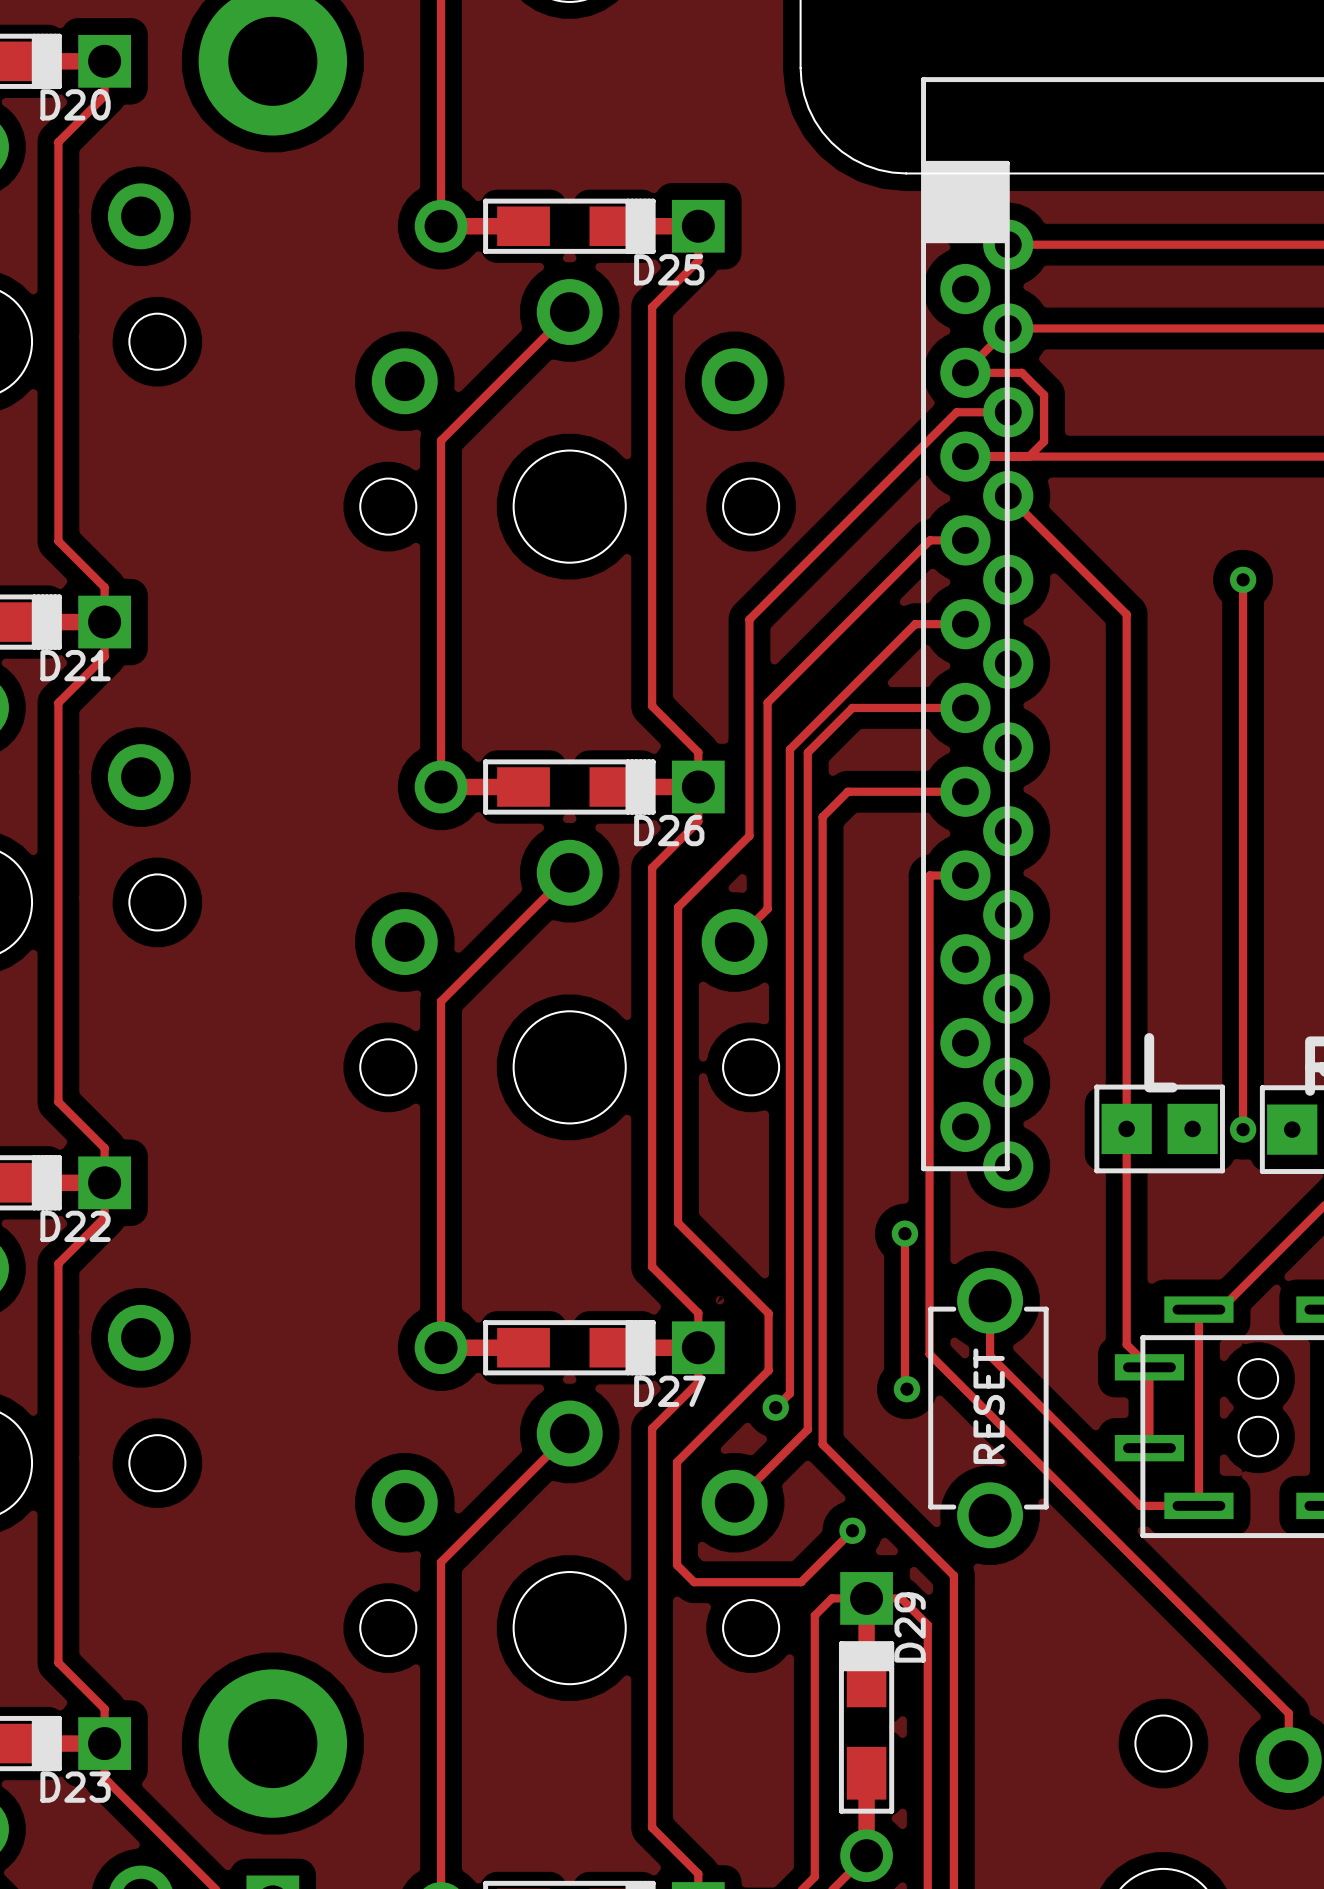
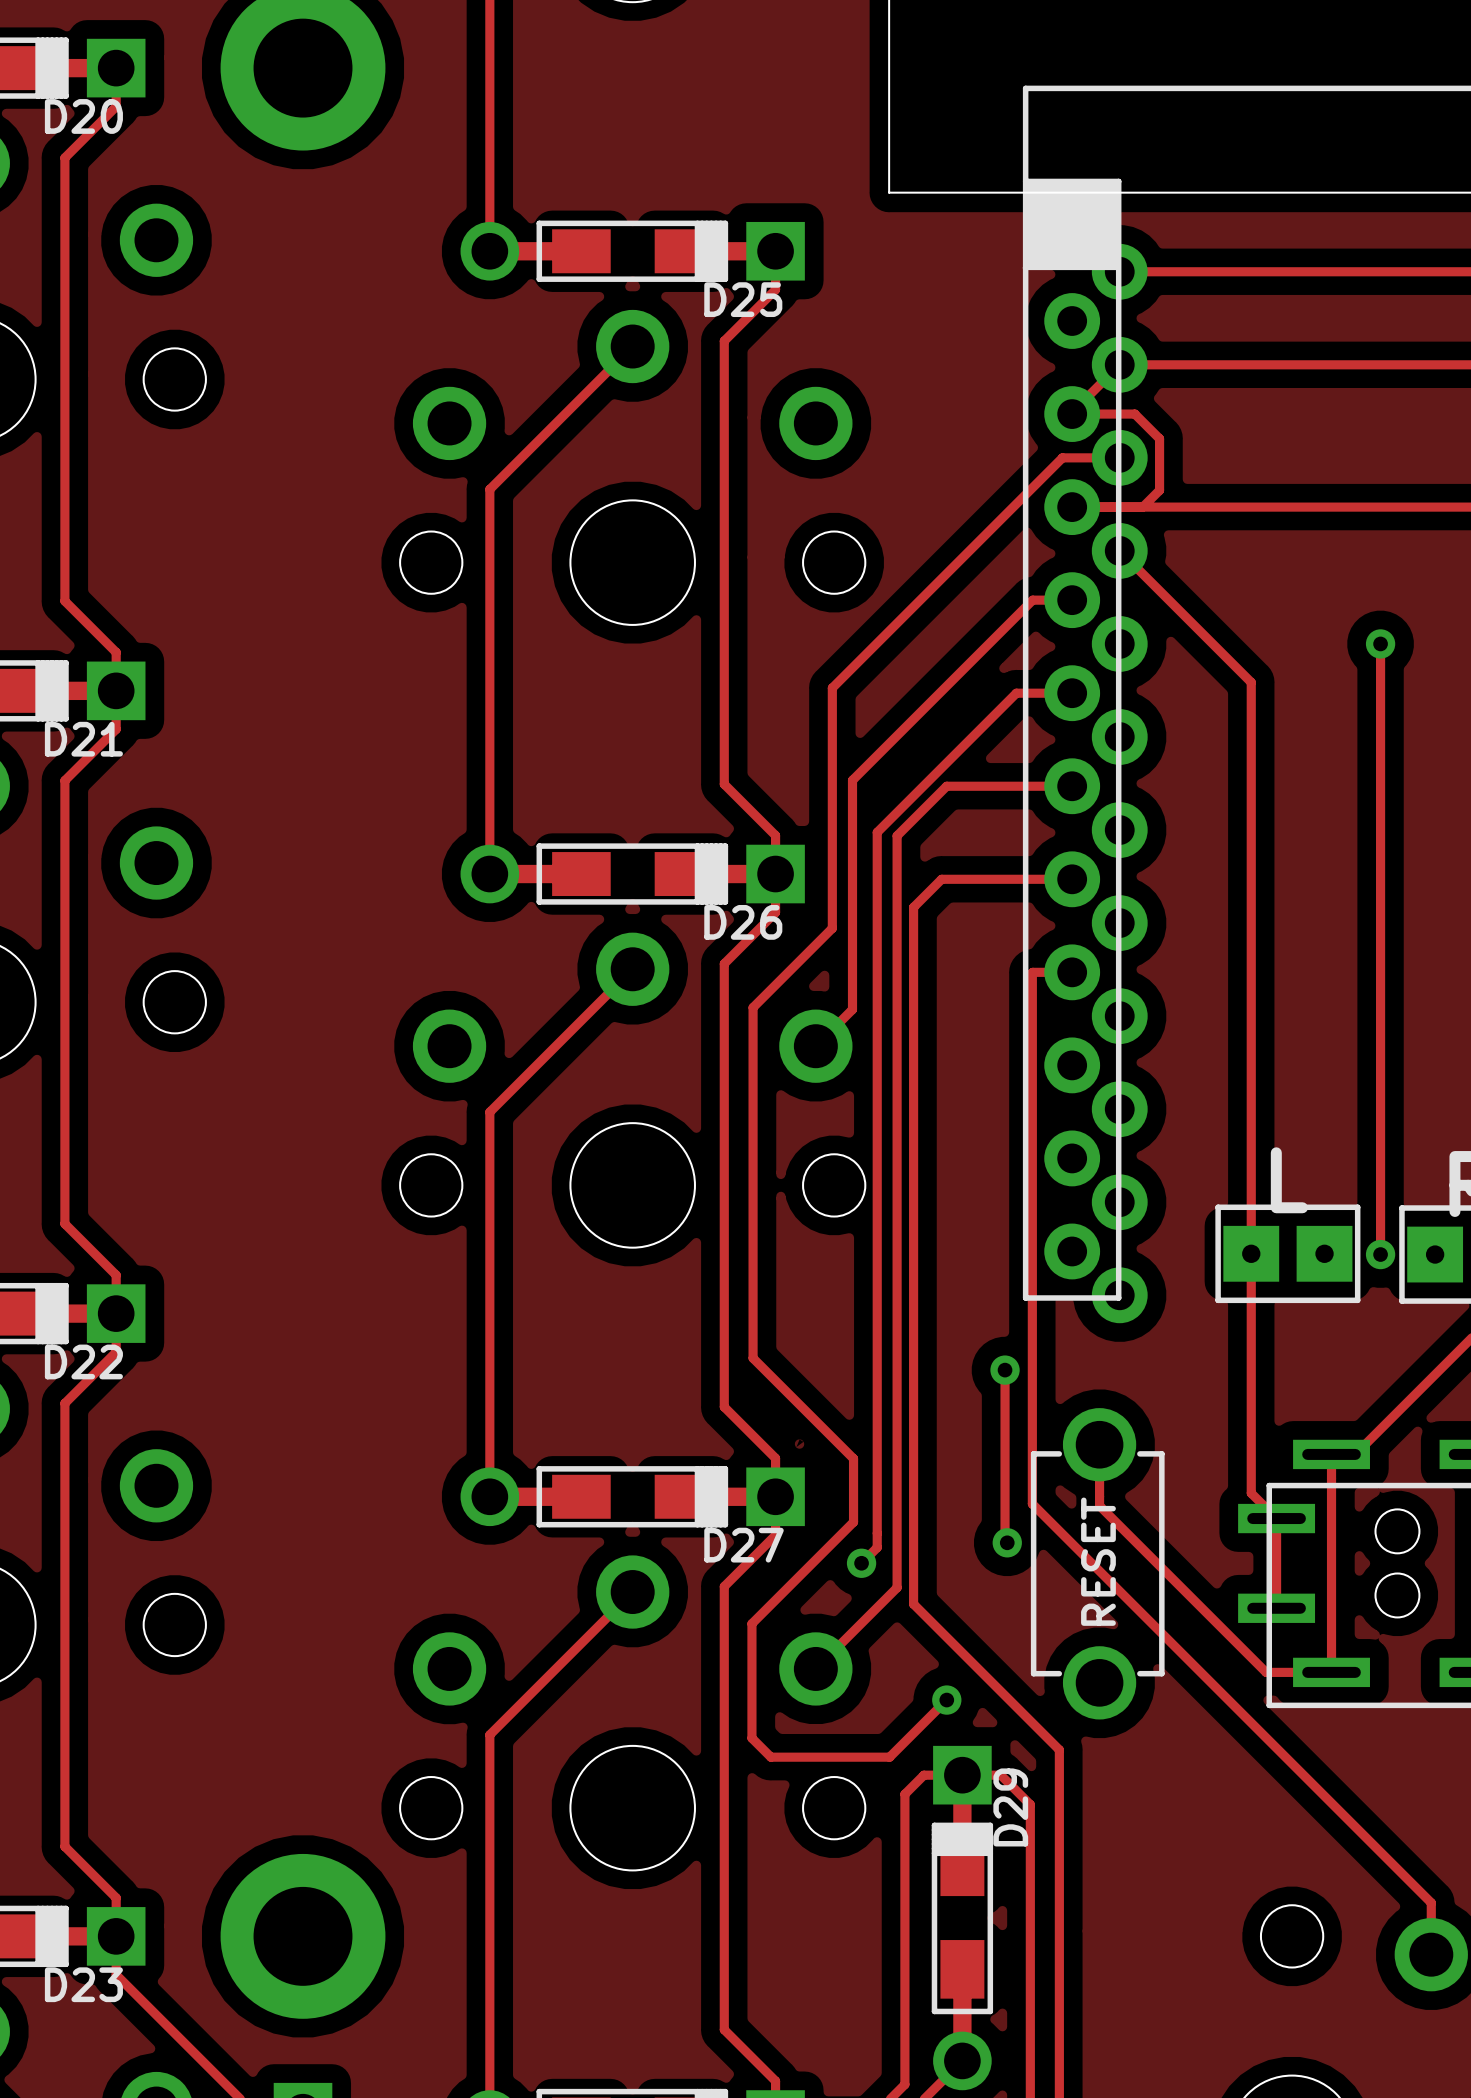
board edge: (800, 67) (801, 81) (808, 108) (814, 120) (831, 142) (853, 159) (865, 165) (892, 172) (906, 173) -> (889, 75) (889, 192) (1006, 192)

